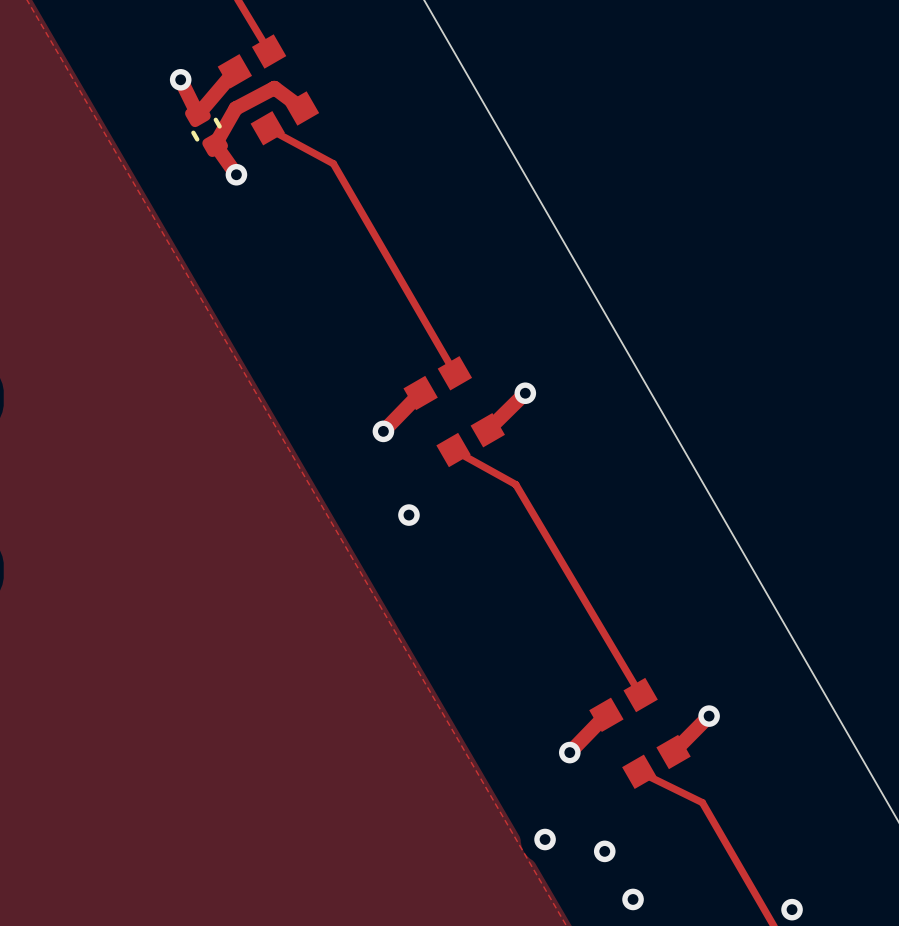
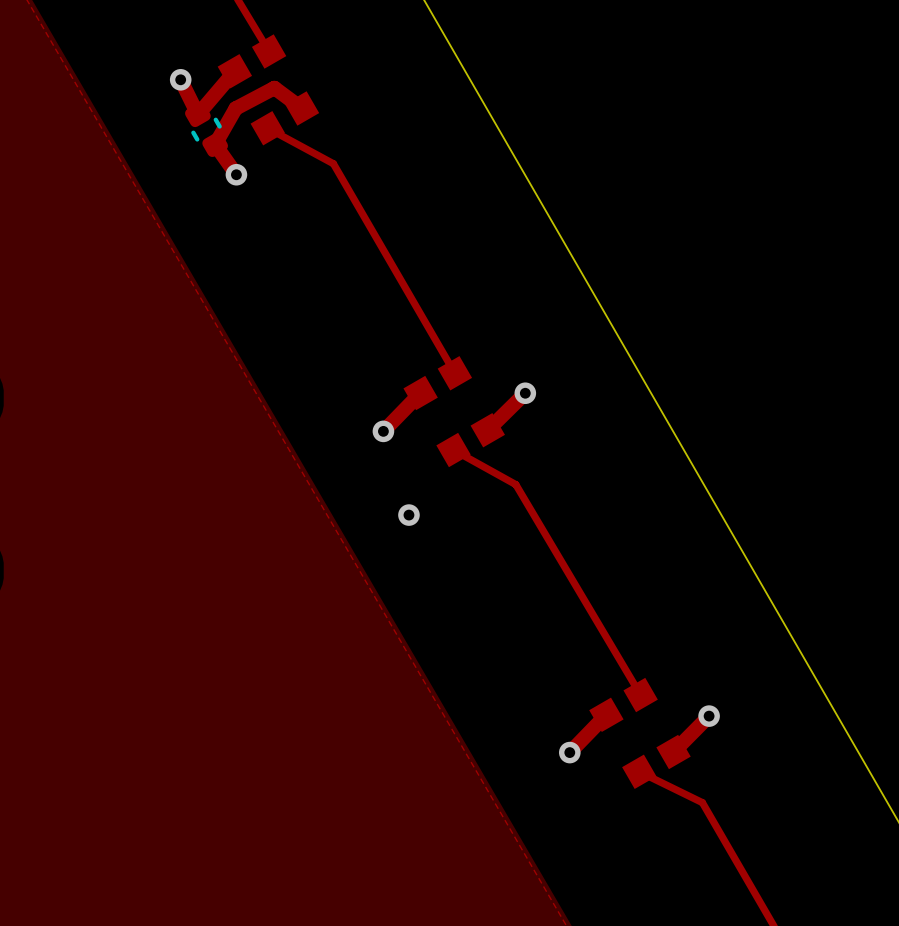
via: (545, 839) -> none
via: (604, 851) -> none
via: (633, 899) -> none
via: (792, 909) -> none

